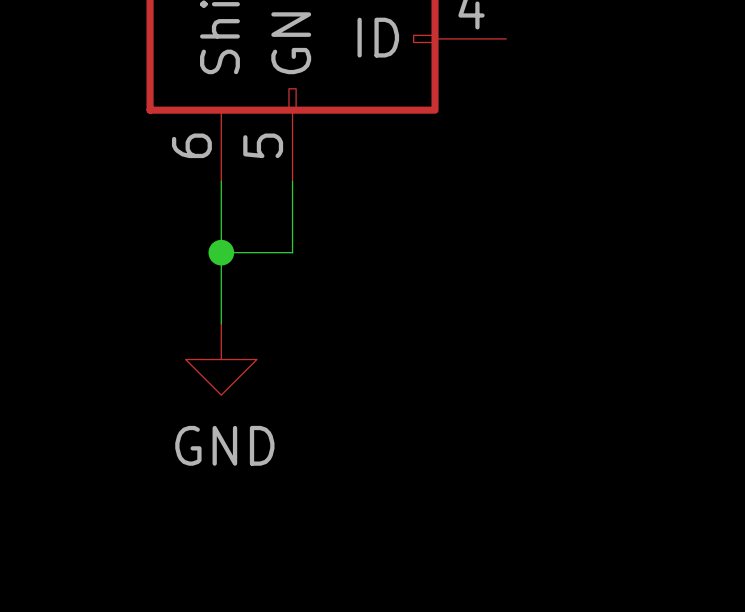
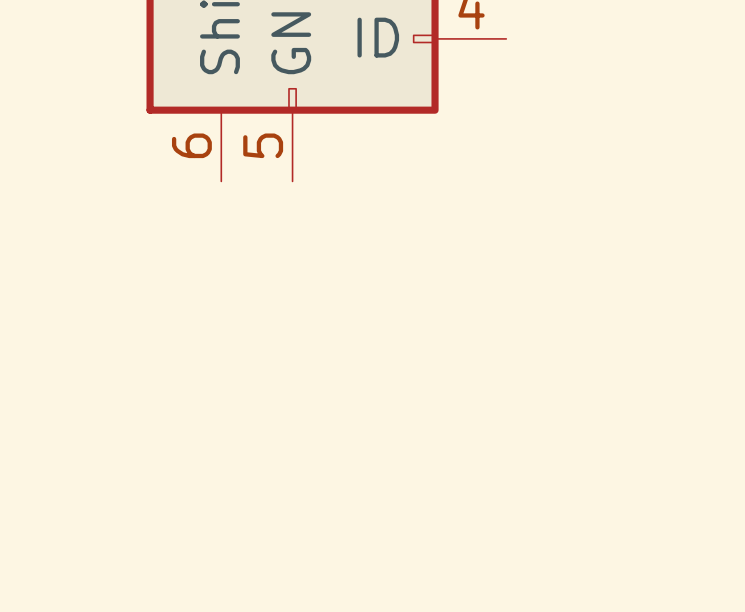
wire: (221, 181) (221, 323) -> none
wire: (292, 181) (292, 252) (221, 252) -> none
junction: (221, 252) -> none
power symbol: GND (221, 359) -> none

